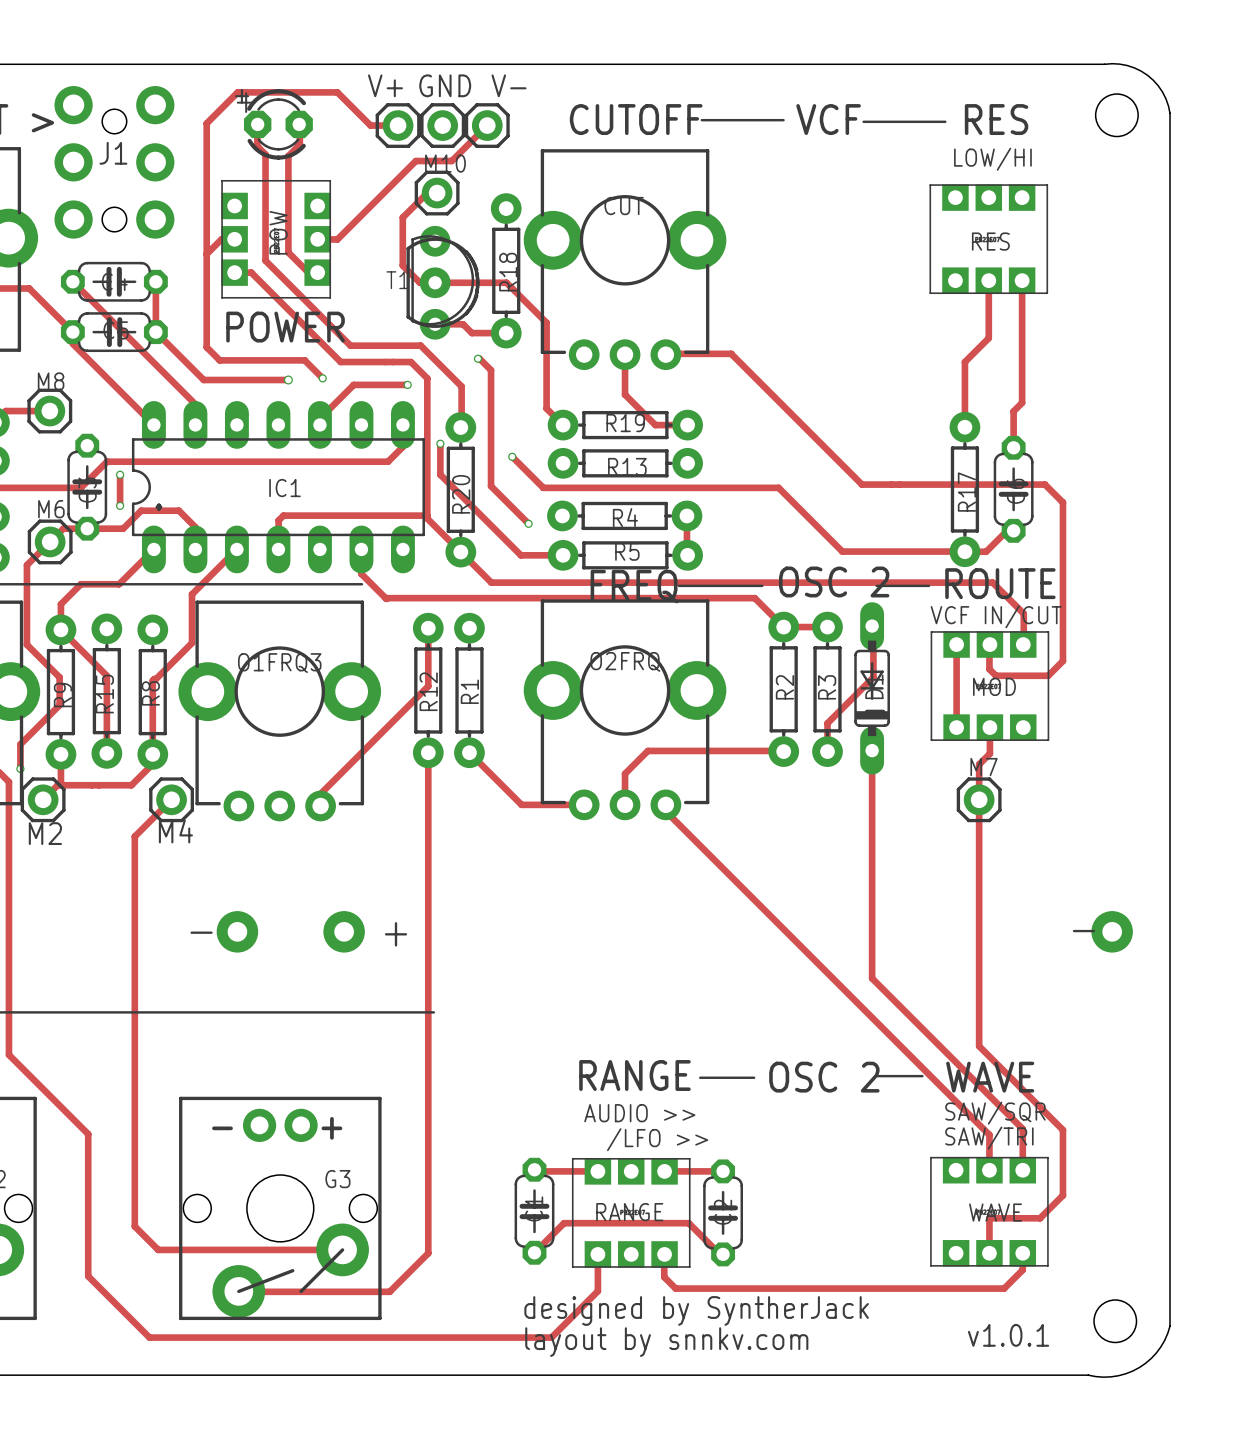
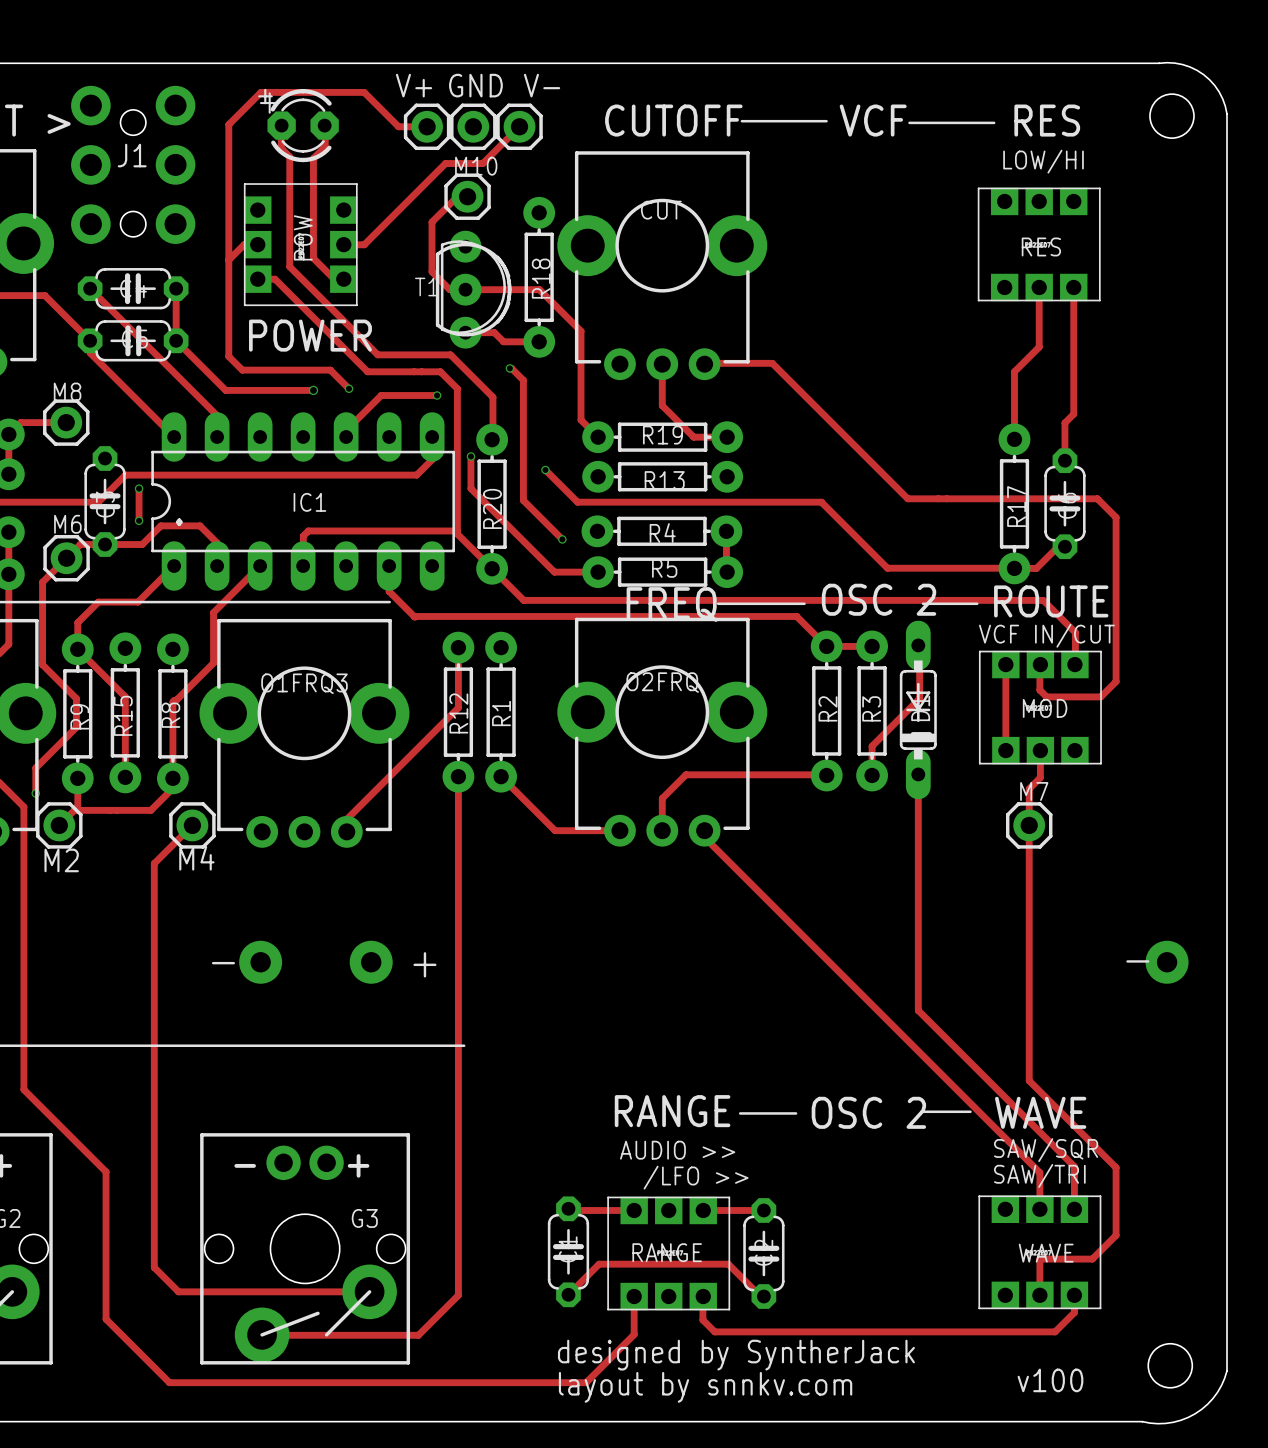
text: v1.0.1 (1008, 1335) -> v100 (1050, 1380)

